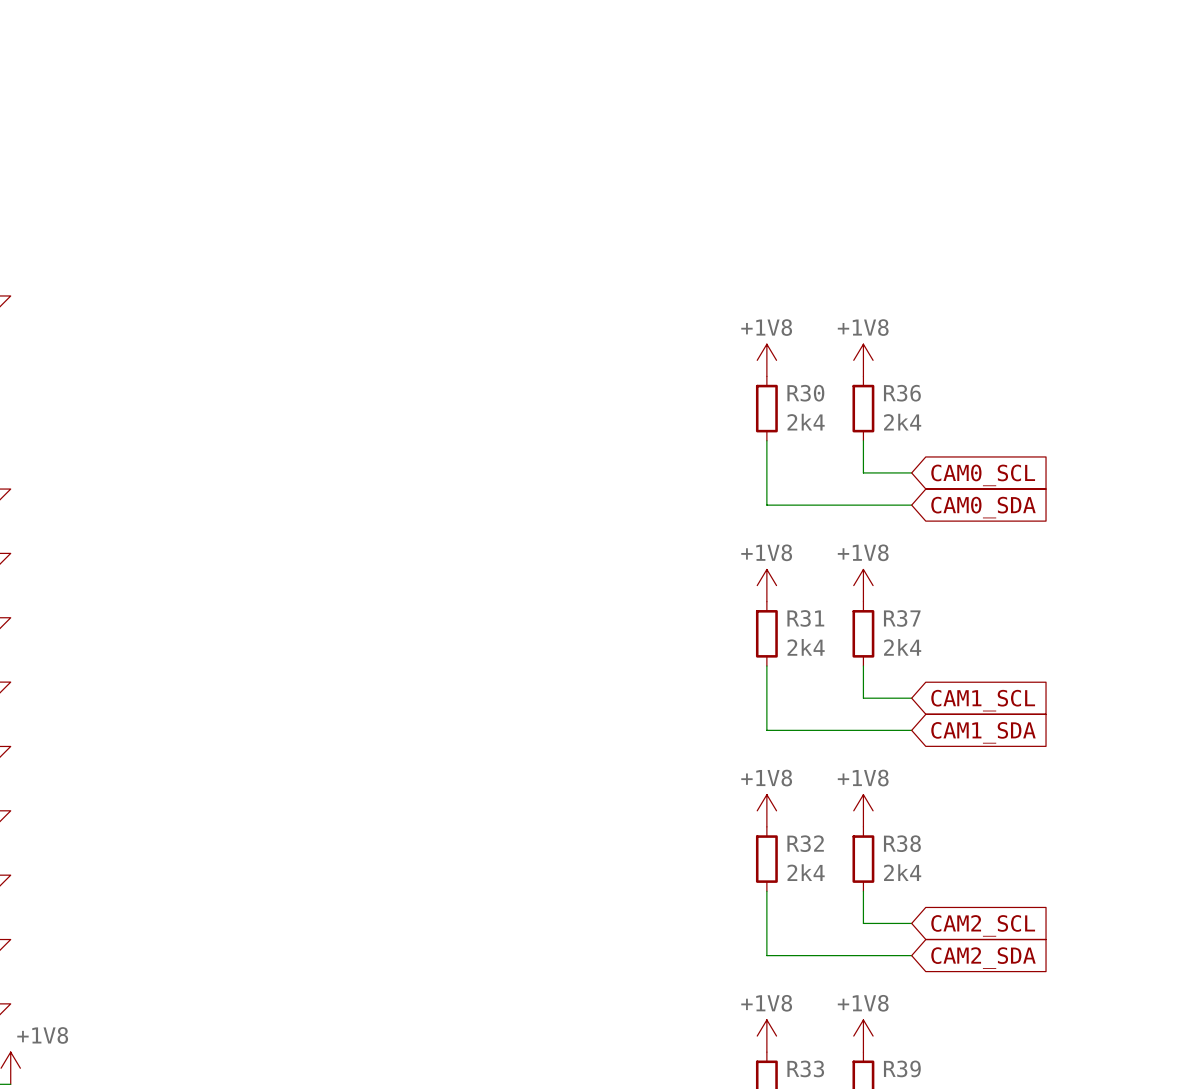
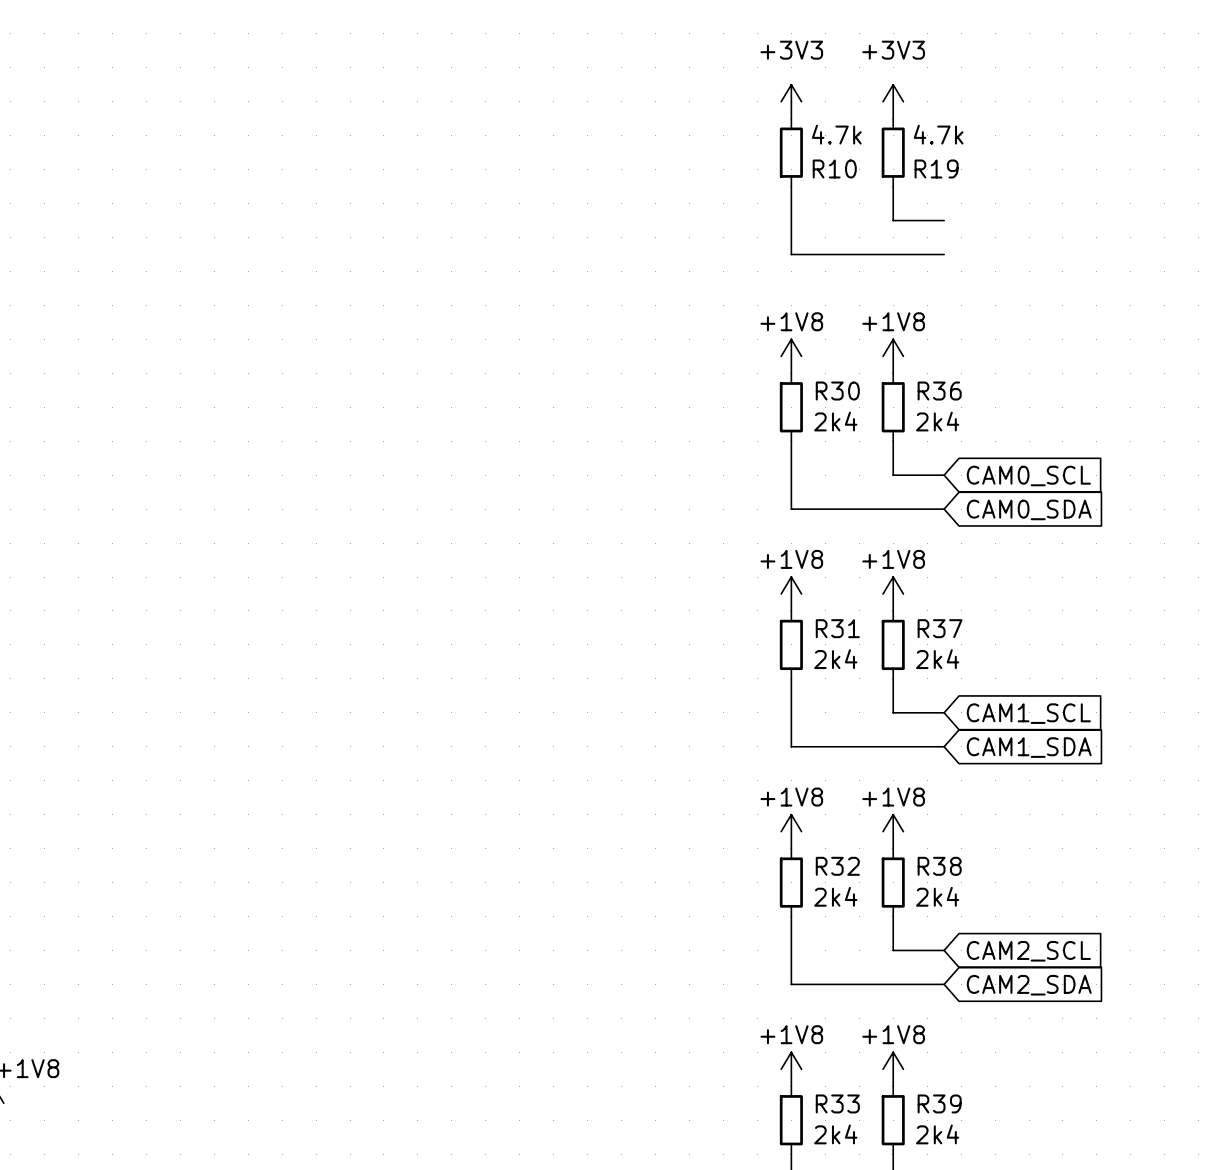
power symbol: none -> +3V3 (791, 101)
power symbol: none -> +3V3 (893, 101)
R10: none -> 4.7k (791, 152)
R19: none -> 4.7k (893, 152)
wire: none -> (791, 186) (791, 254) (944, 254)
wire: none -> (893, 186) (893, 220) (944, 220)

